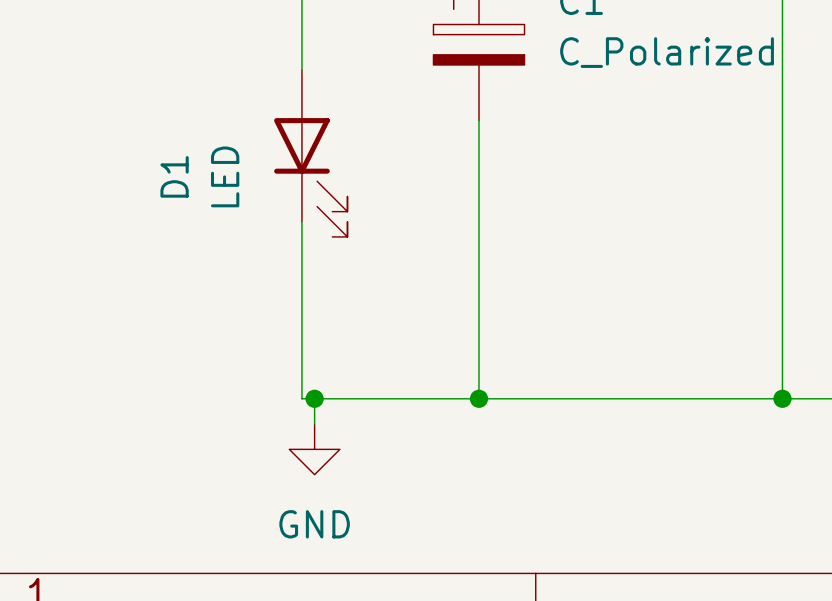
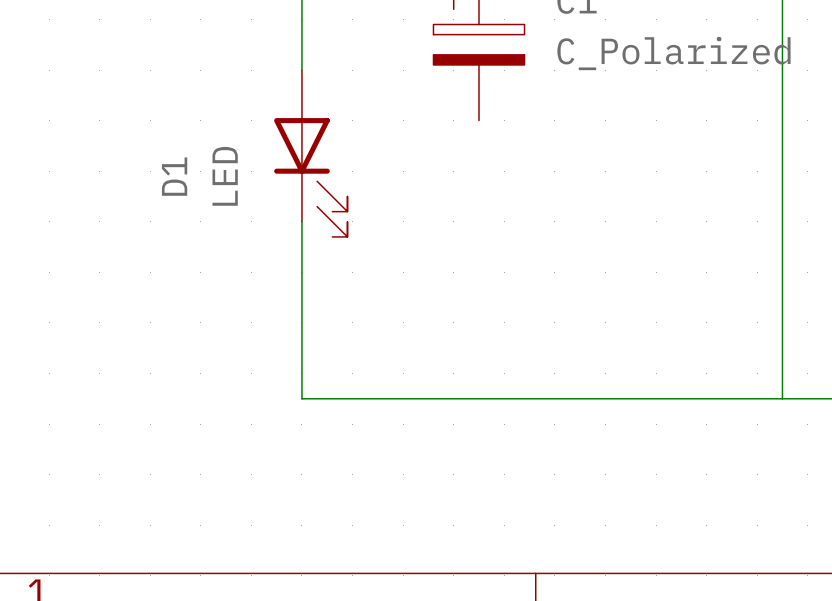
wire: (478, 120) (478, 398) -> none
wire: (314, 398) (314, 424) -> none
junction: (314, 398) -> none
junction: (478, 398) -> none
junction: (782, 398) -> none
power symbol: GND (314, 449) -> none

